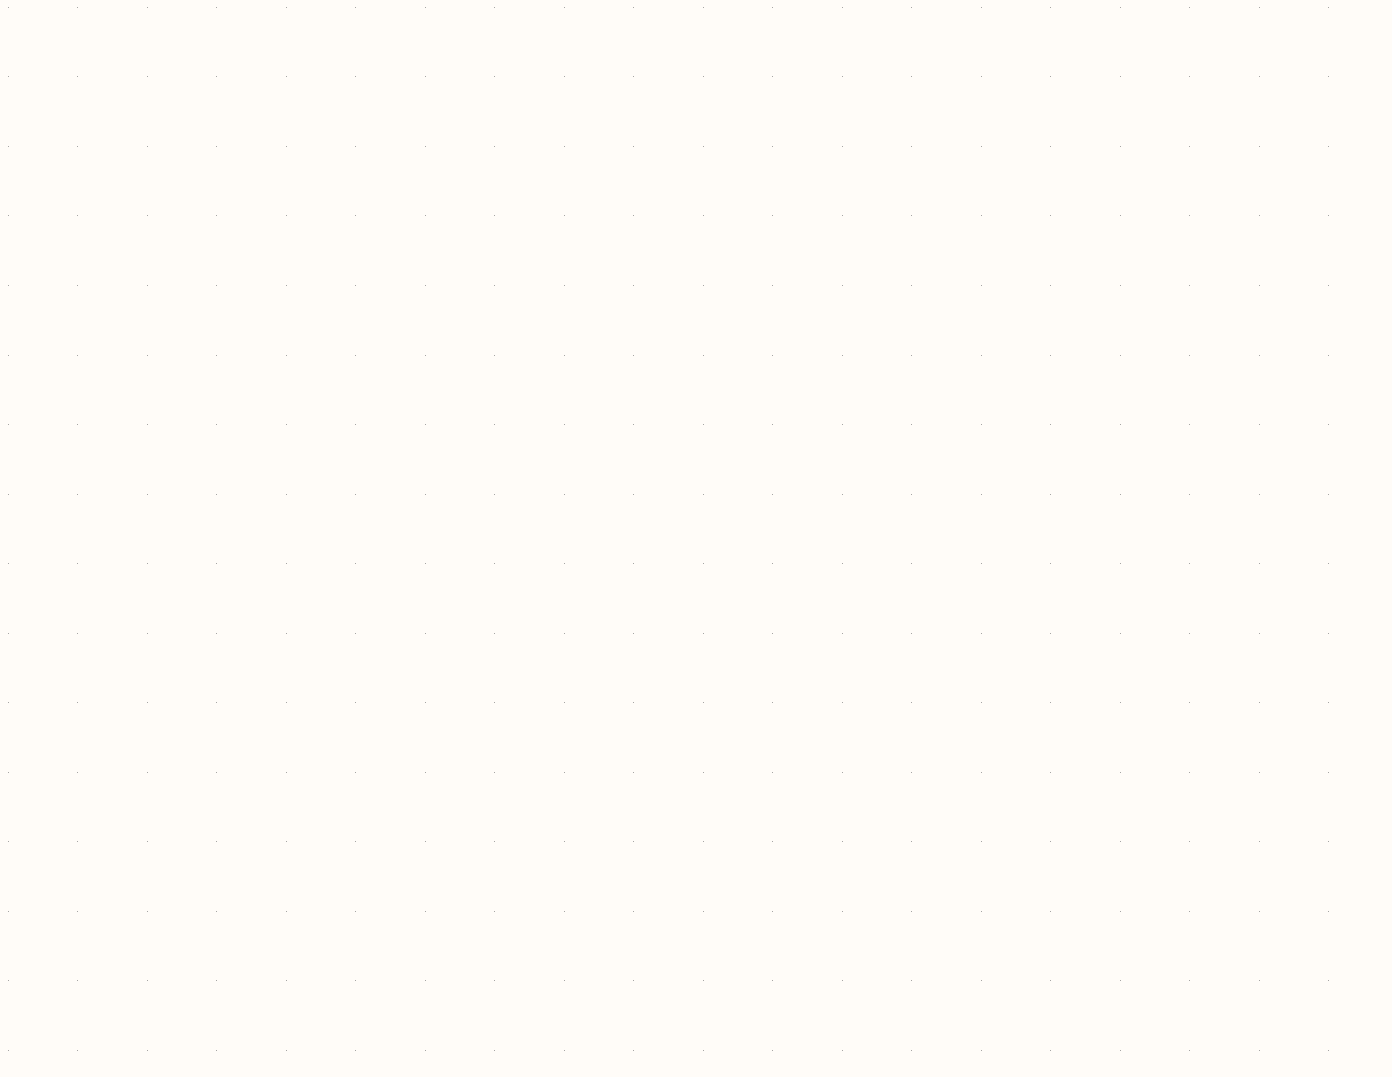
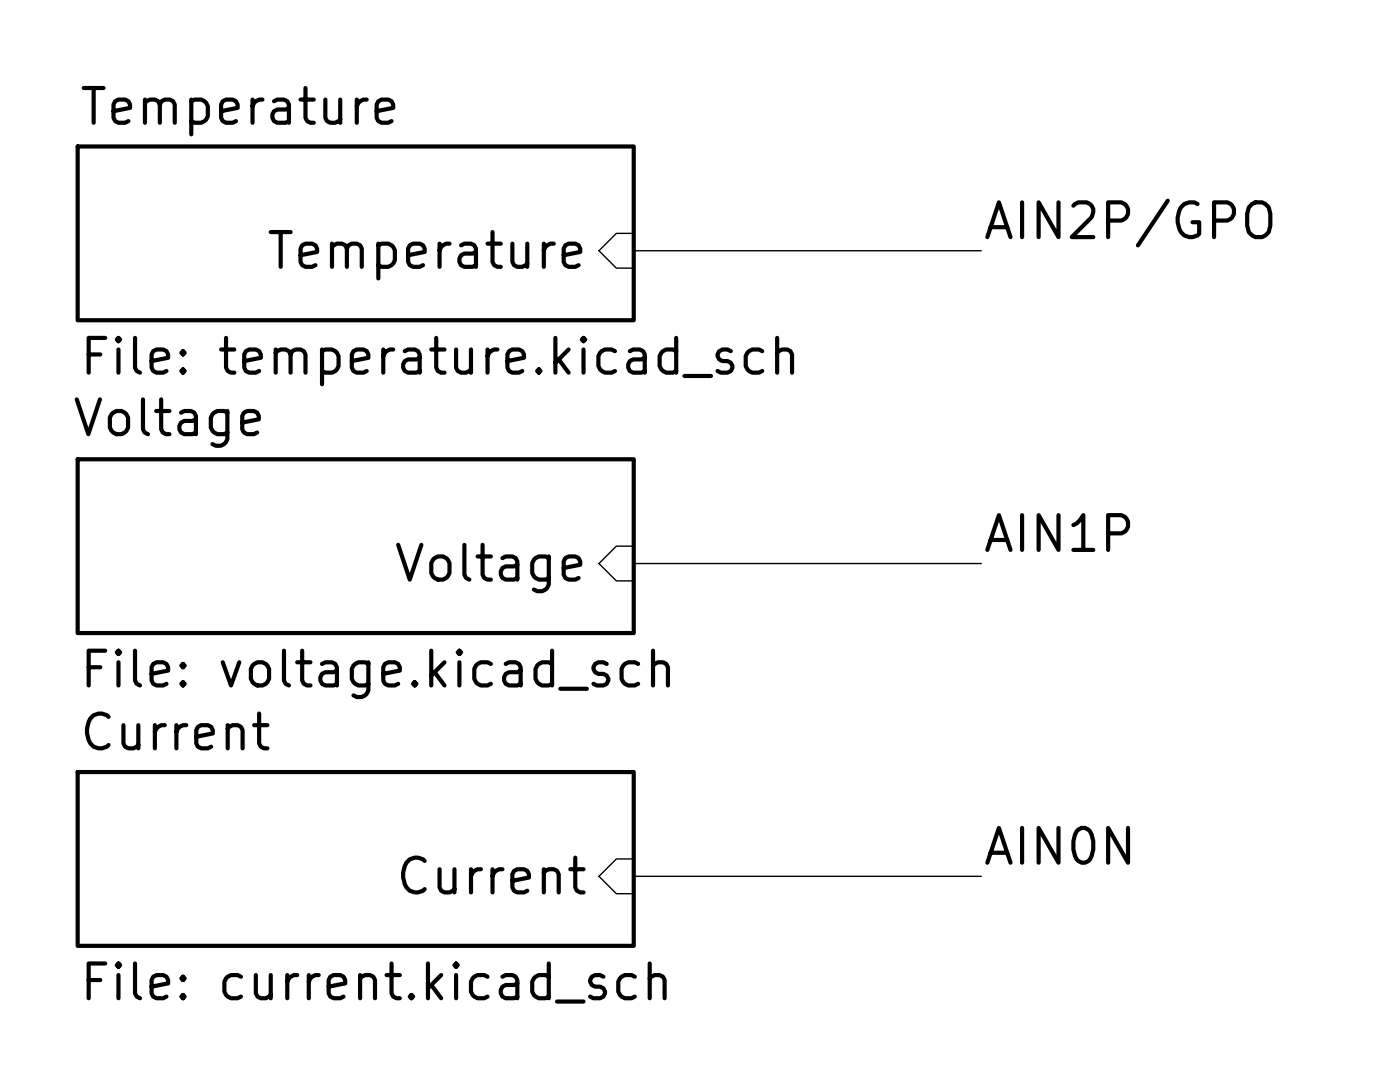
label: none -> AIN2P/GPO (1128, 223)
sheet Temperature: none -> File: temperature.kicad_sch (355, 233)
wire: none -> (633, 250) (981, 250)
sheet pin: none -> Temperature (425, 255)
label: none -> AIN1P (1057, 532)
sheet Voltage: none -> File: voltage.kicad_sch (355, 546)
wire: none -> (633, 563) (981, 563)
sheet pin: none -> Voltage (489, 568)
label: none -> AIN0N (1057, 845)
sheet Current: none -> File: current.kicad_sch (355, 858)
sheet pin: none -> Current (493, 875)
wire: none -> (633, 876) (981, 876)

